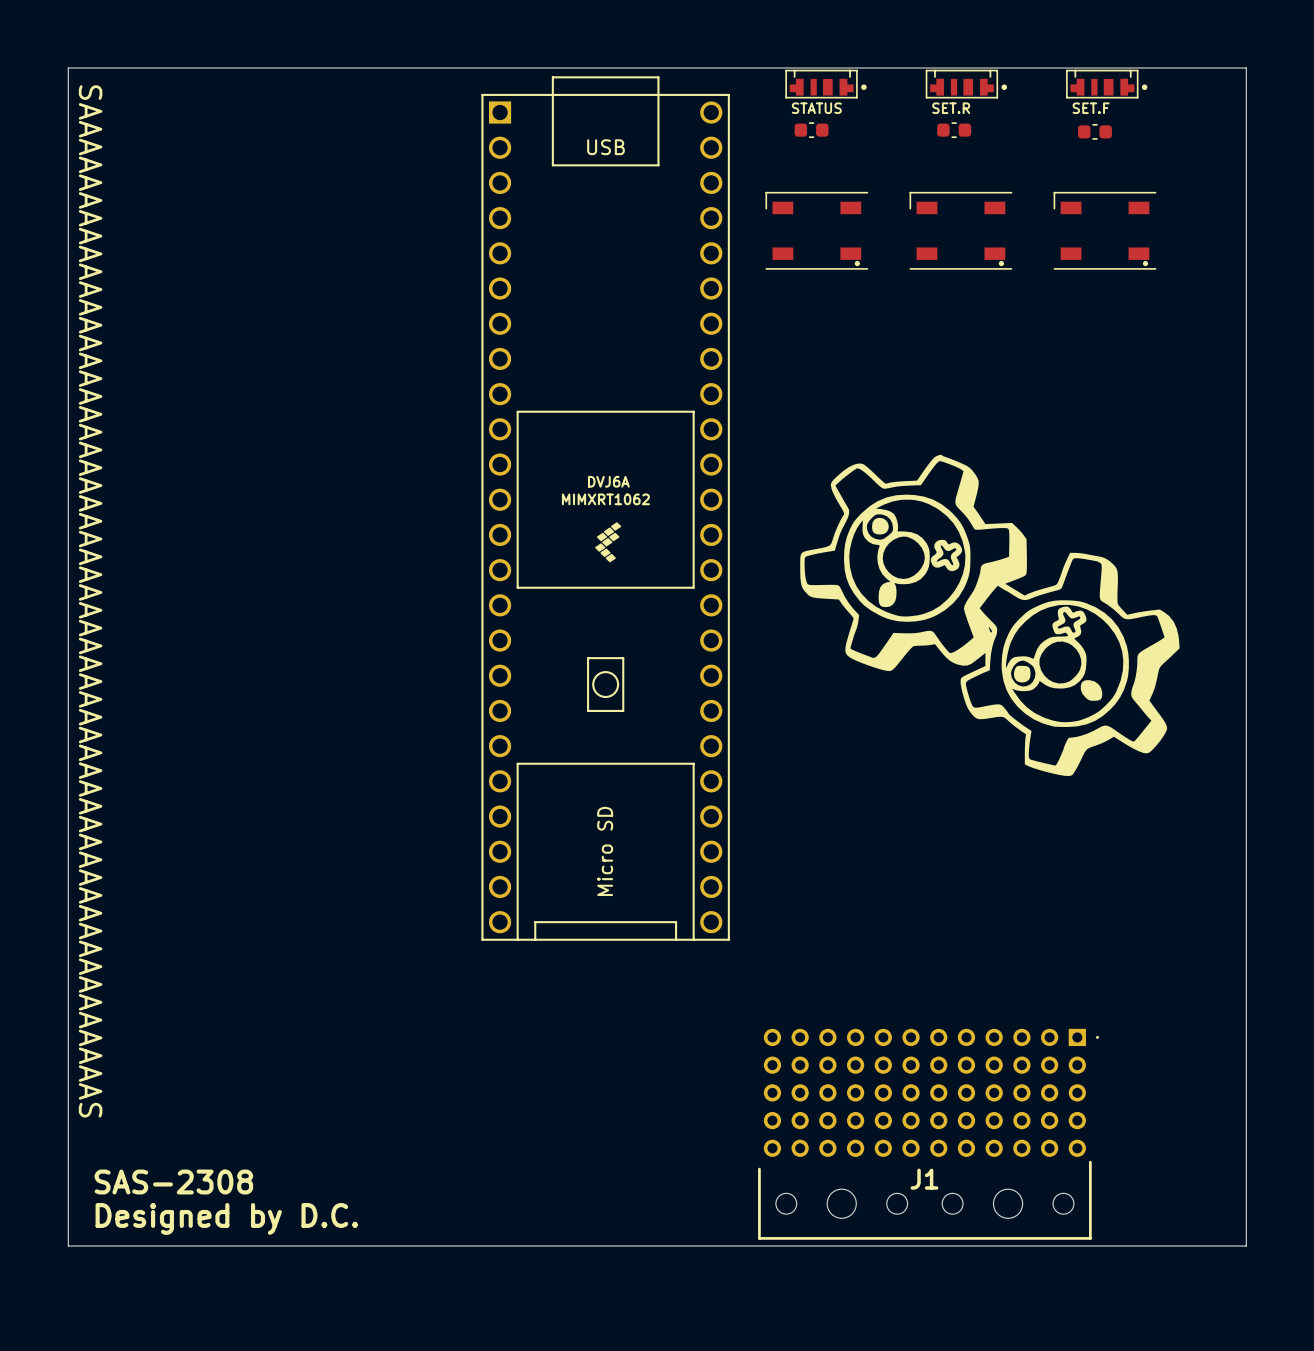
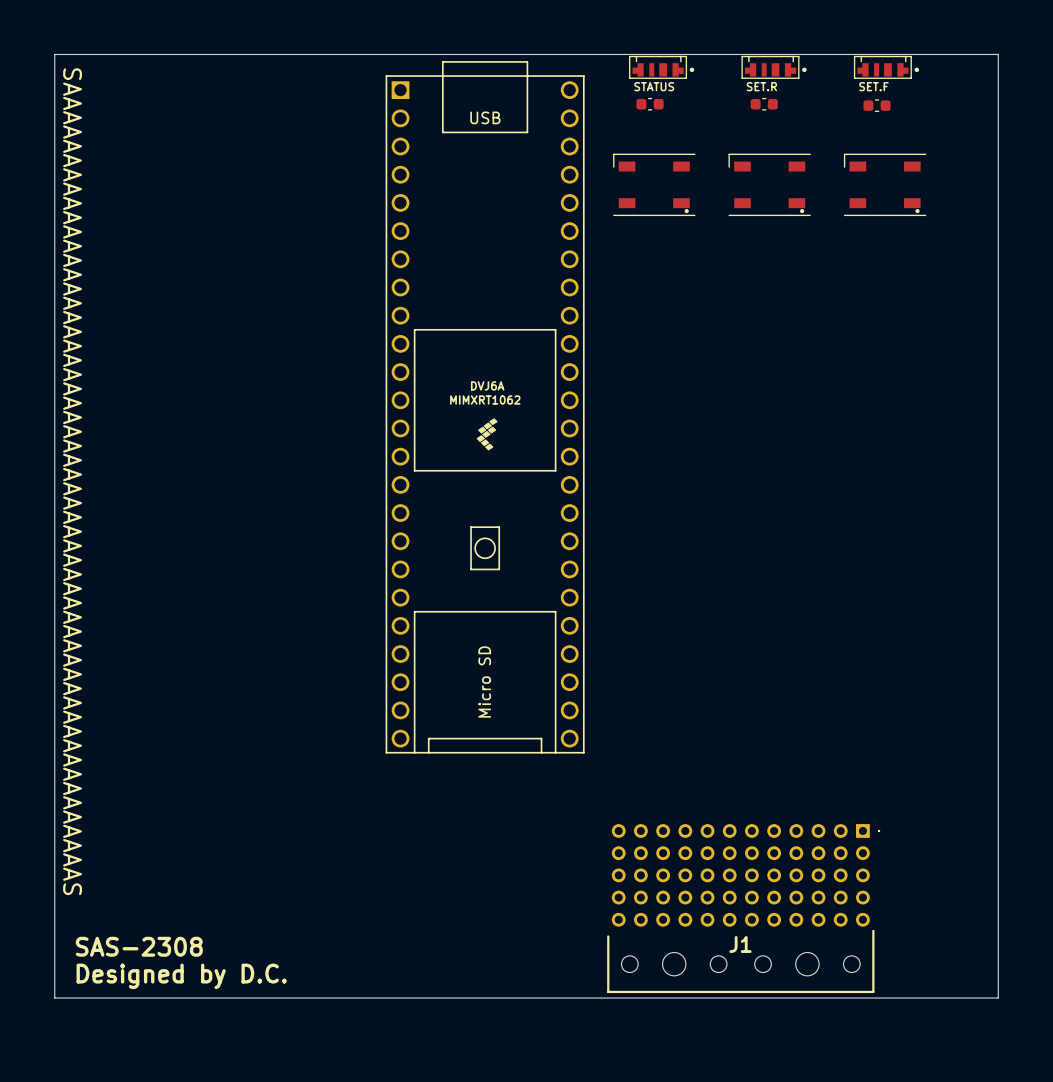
drawing: [800, 454, 1180, 777] -> none

